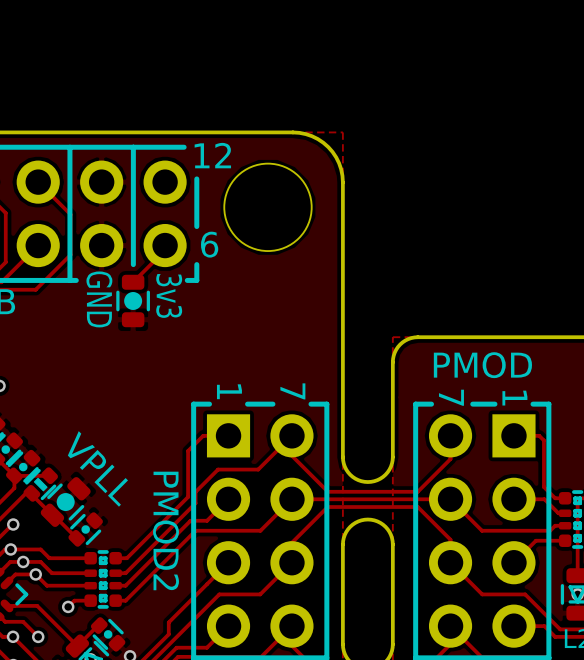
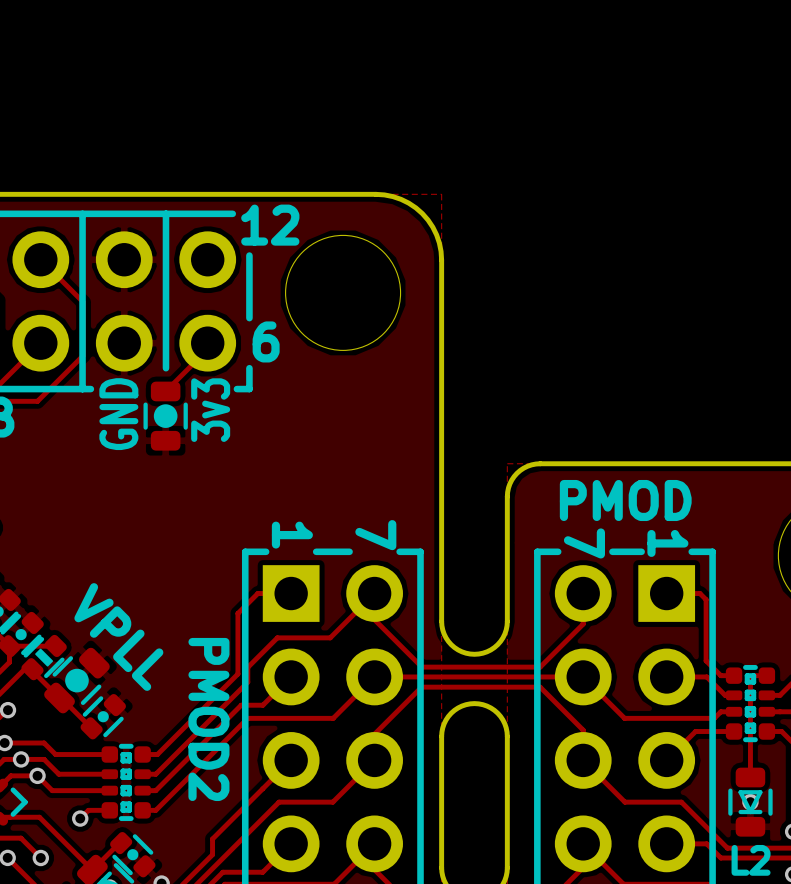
text rotation: 0° (169, 295) -> 180° (210, 410)
text rotation: 0° (99, 299) -> 180° (118, 414)

